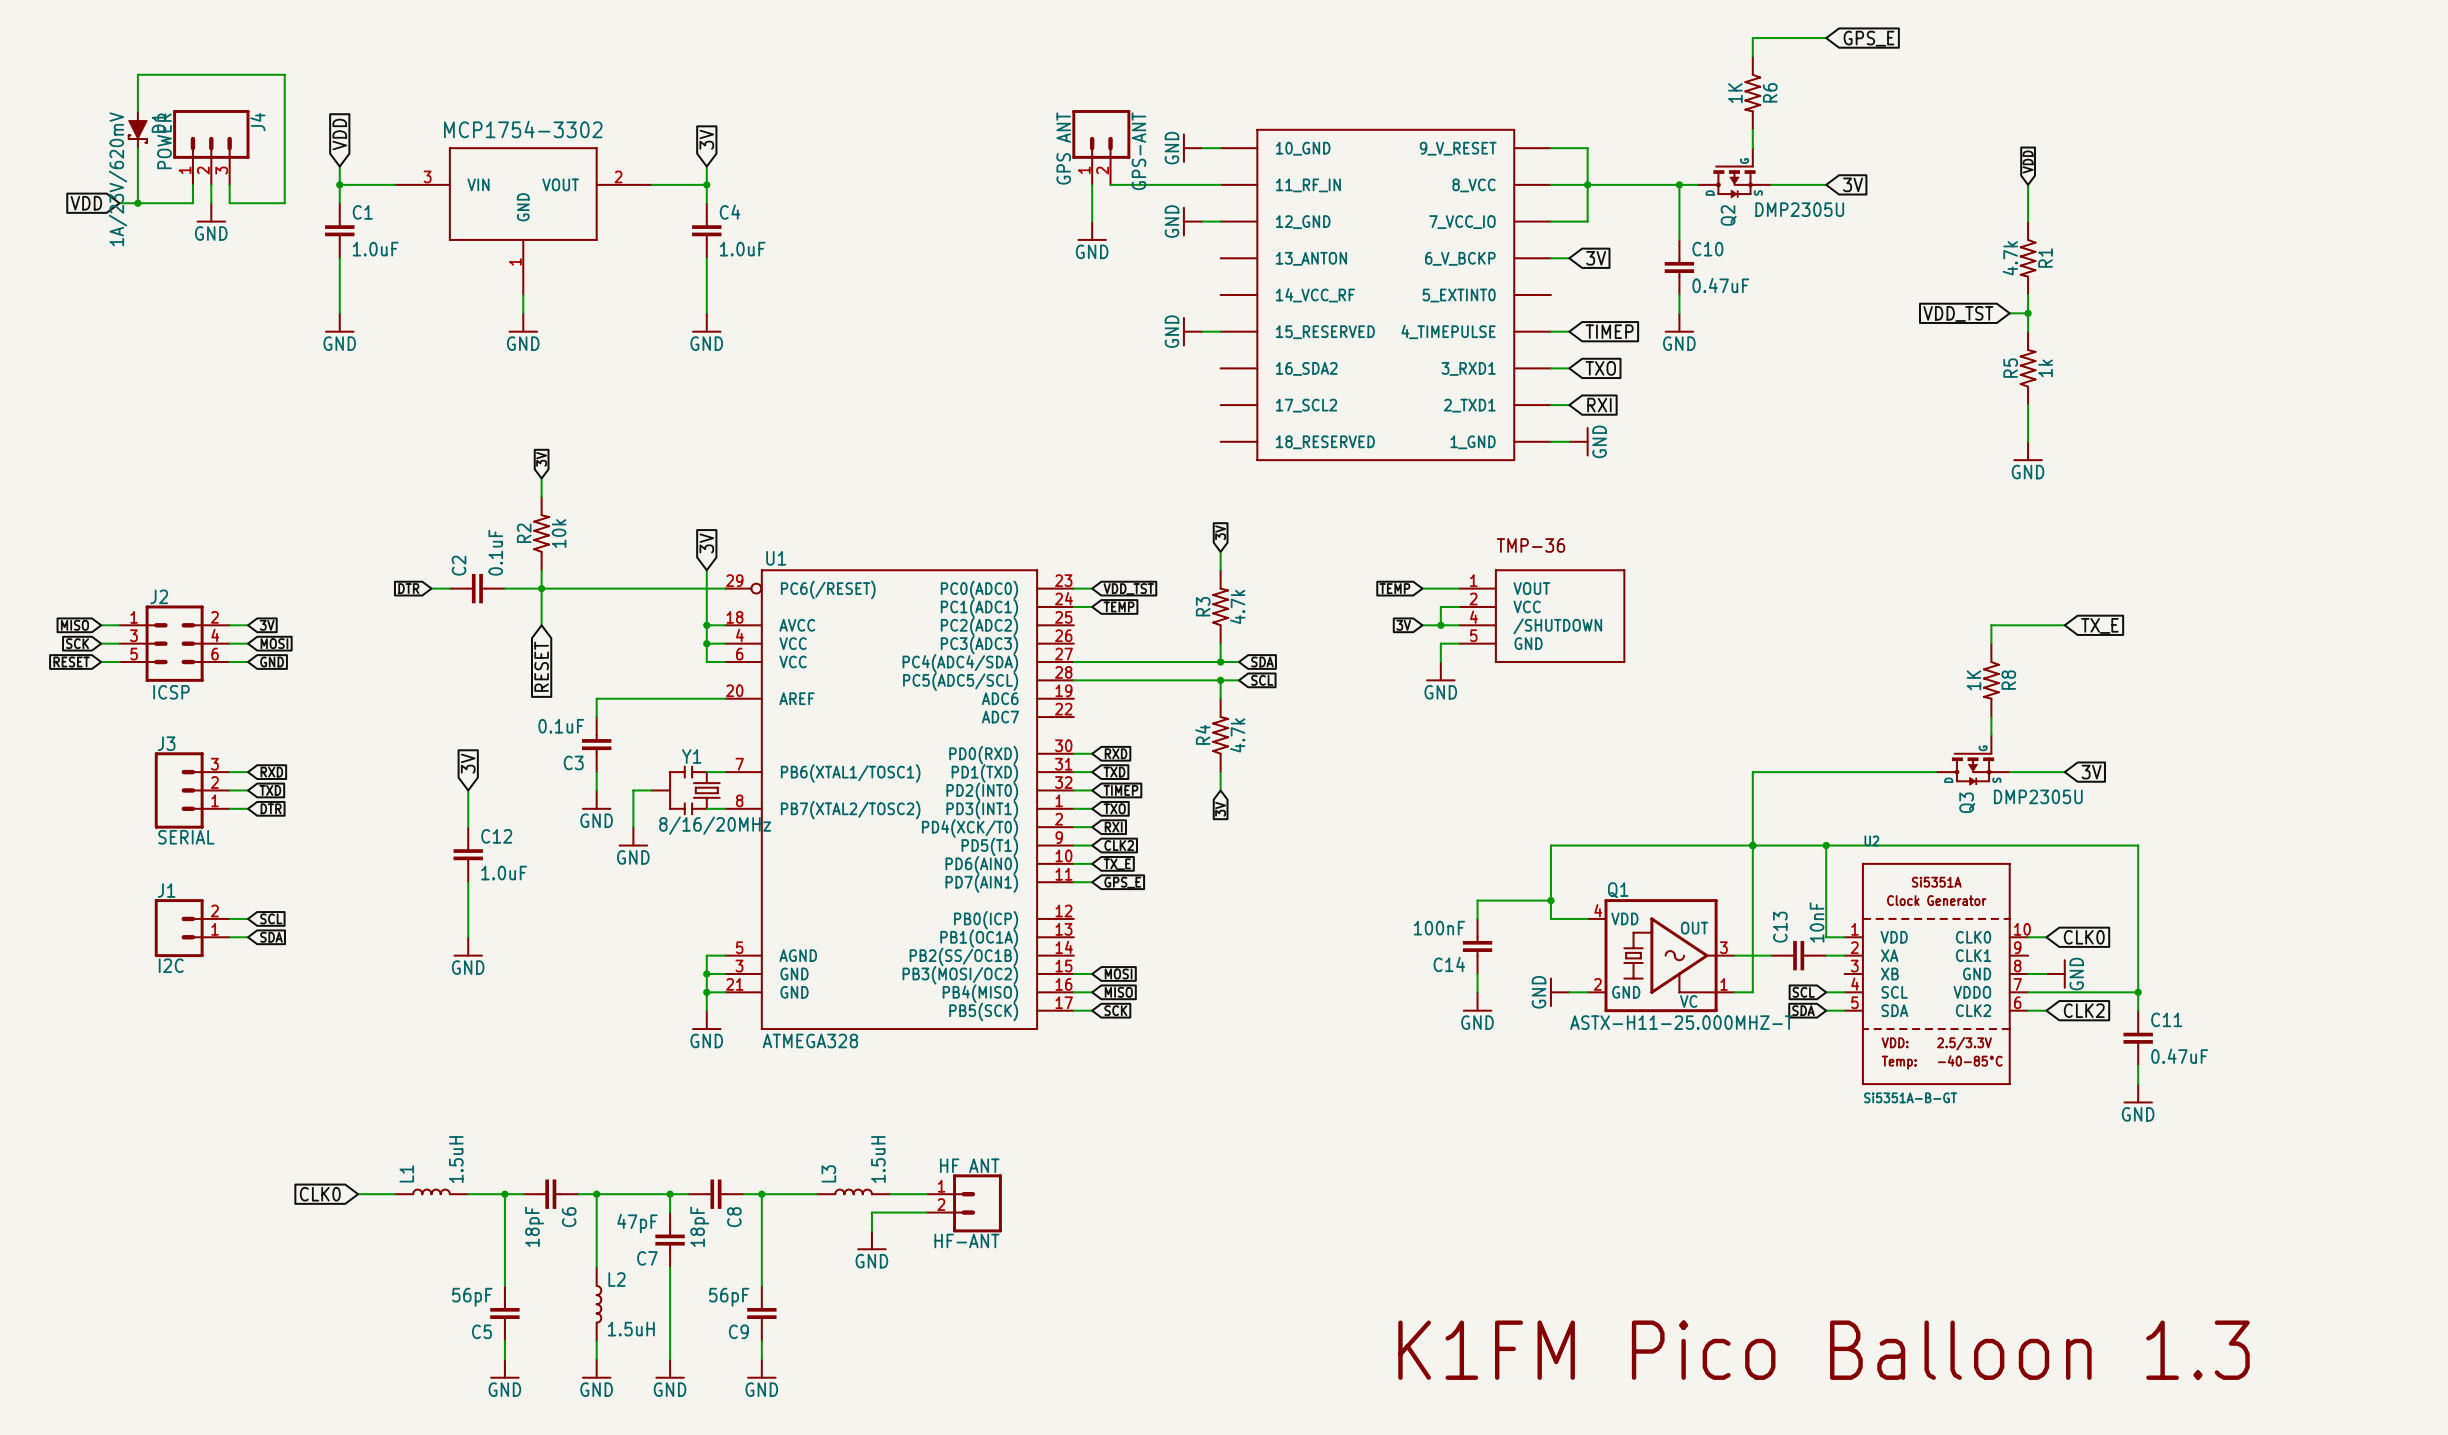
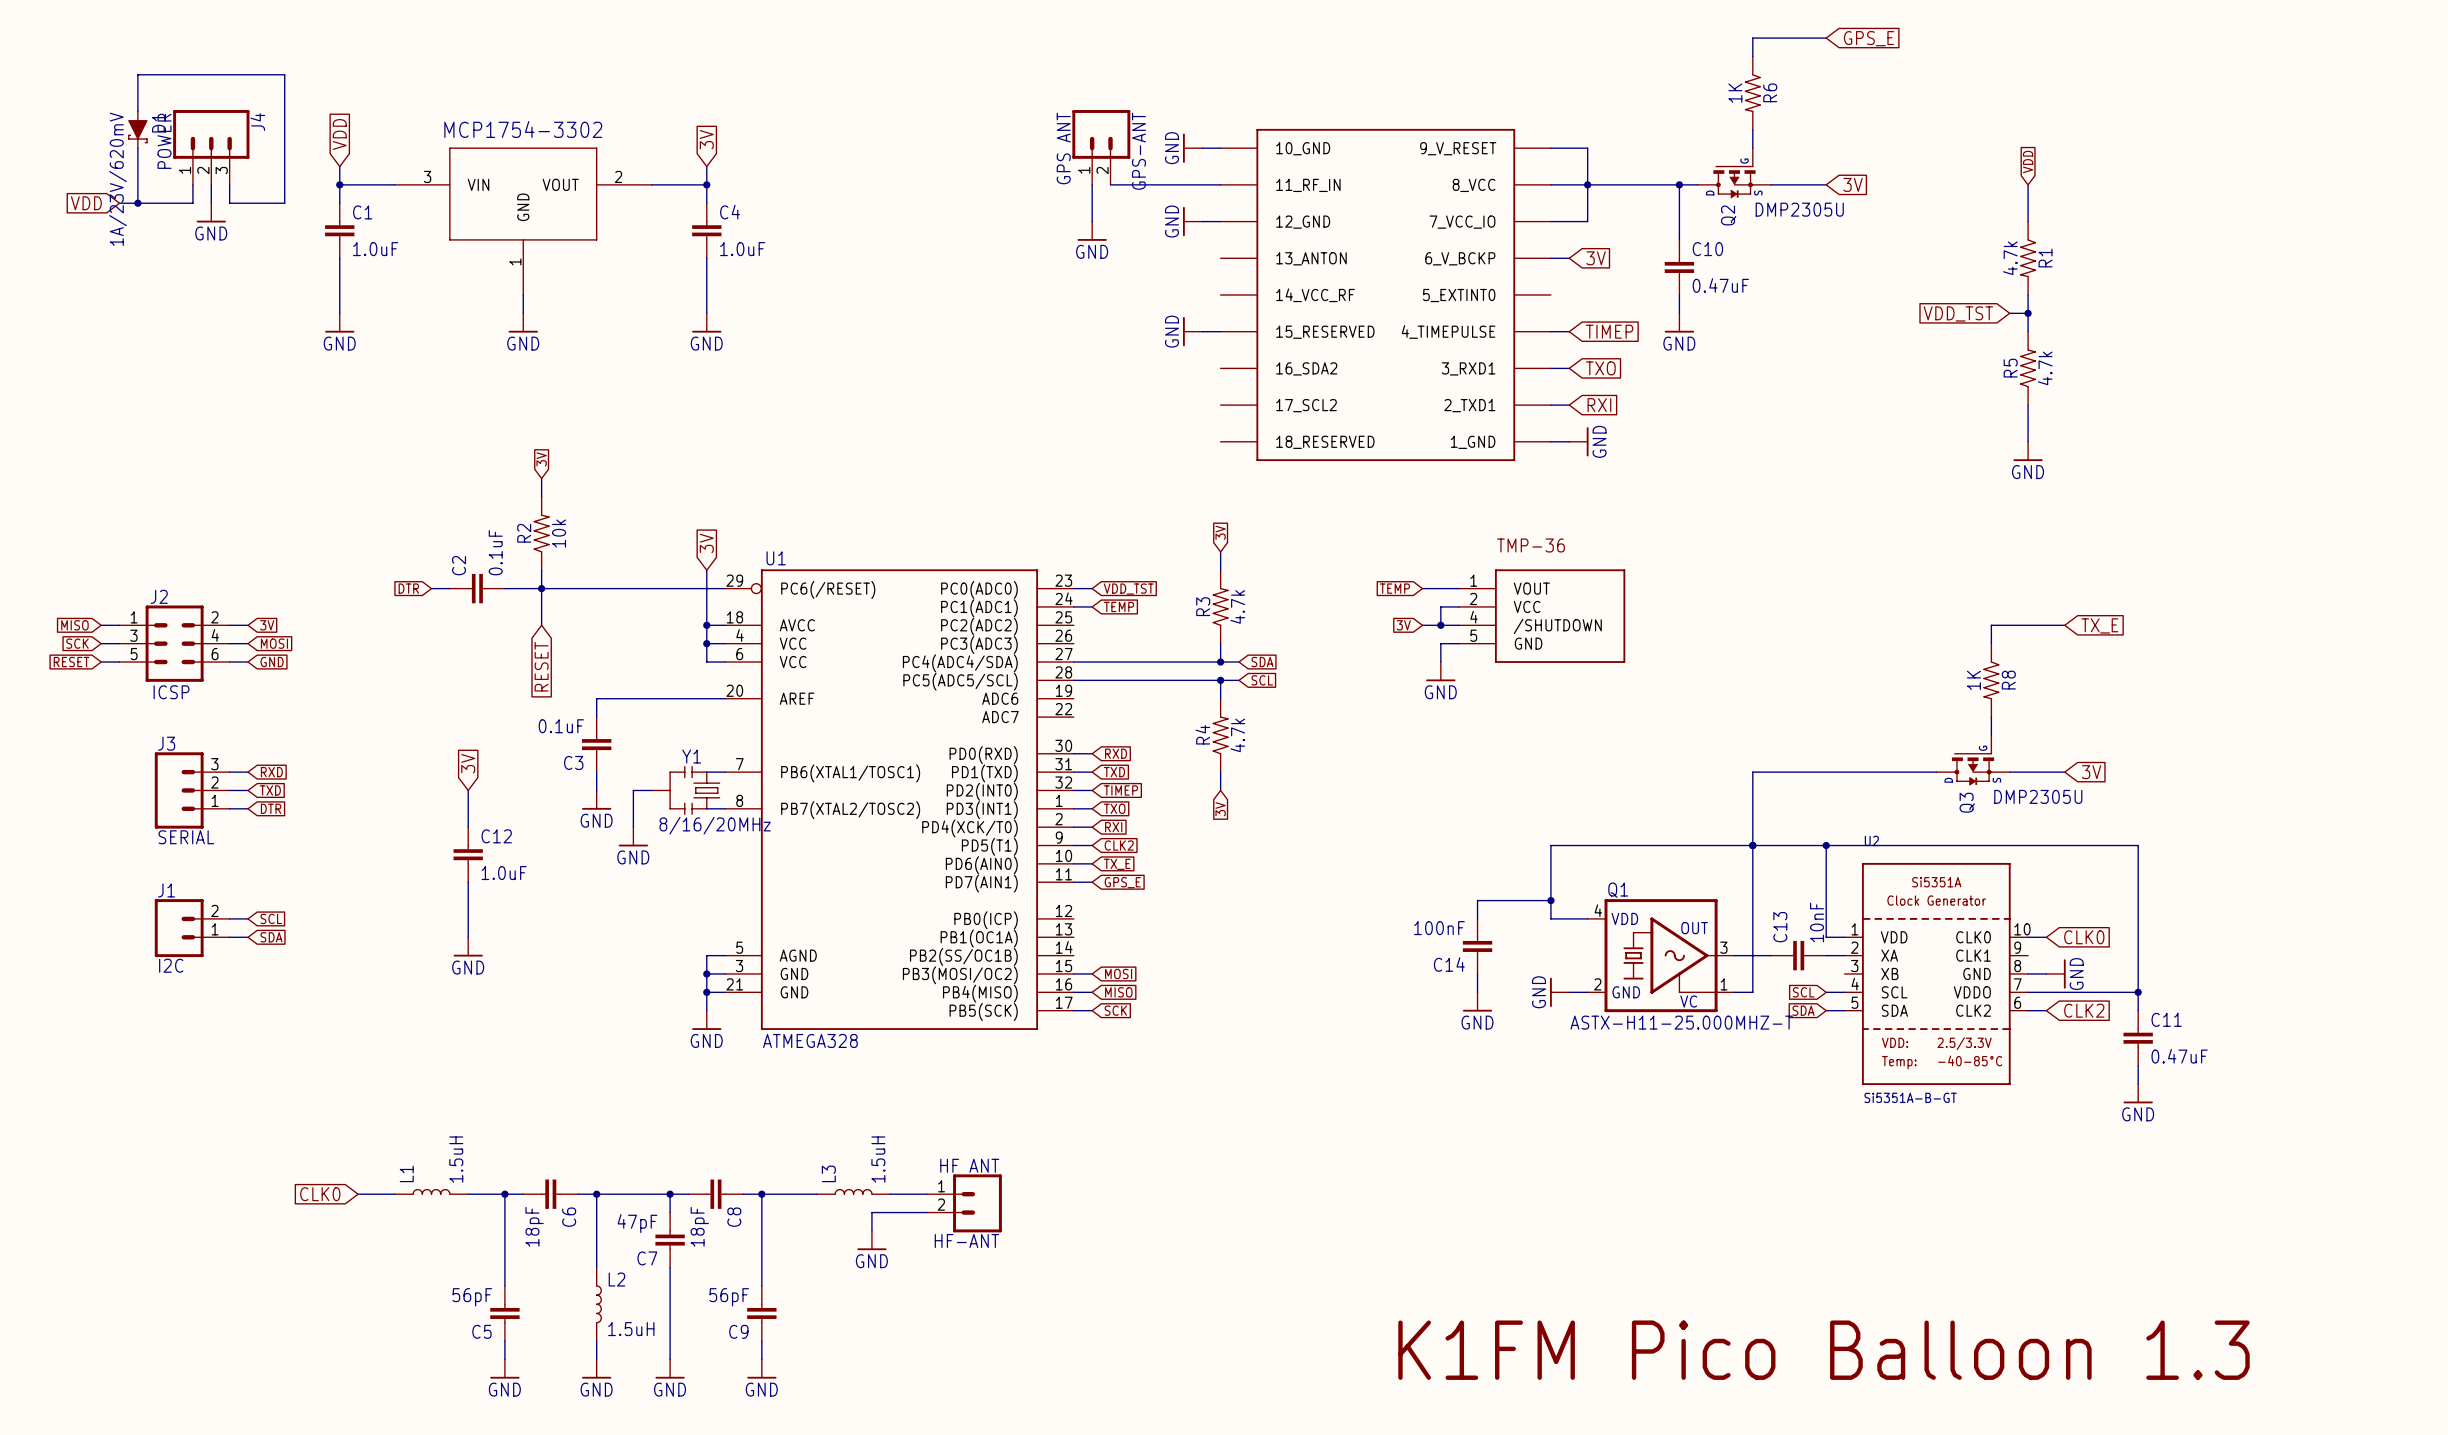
R5 value: 1k (2045, 368) -> 4.7k (2045, 368)

